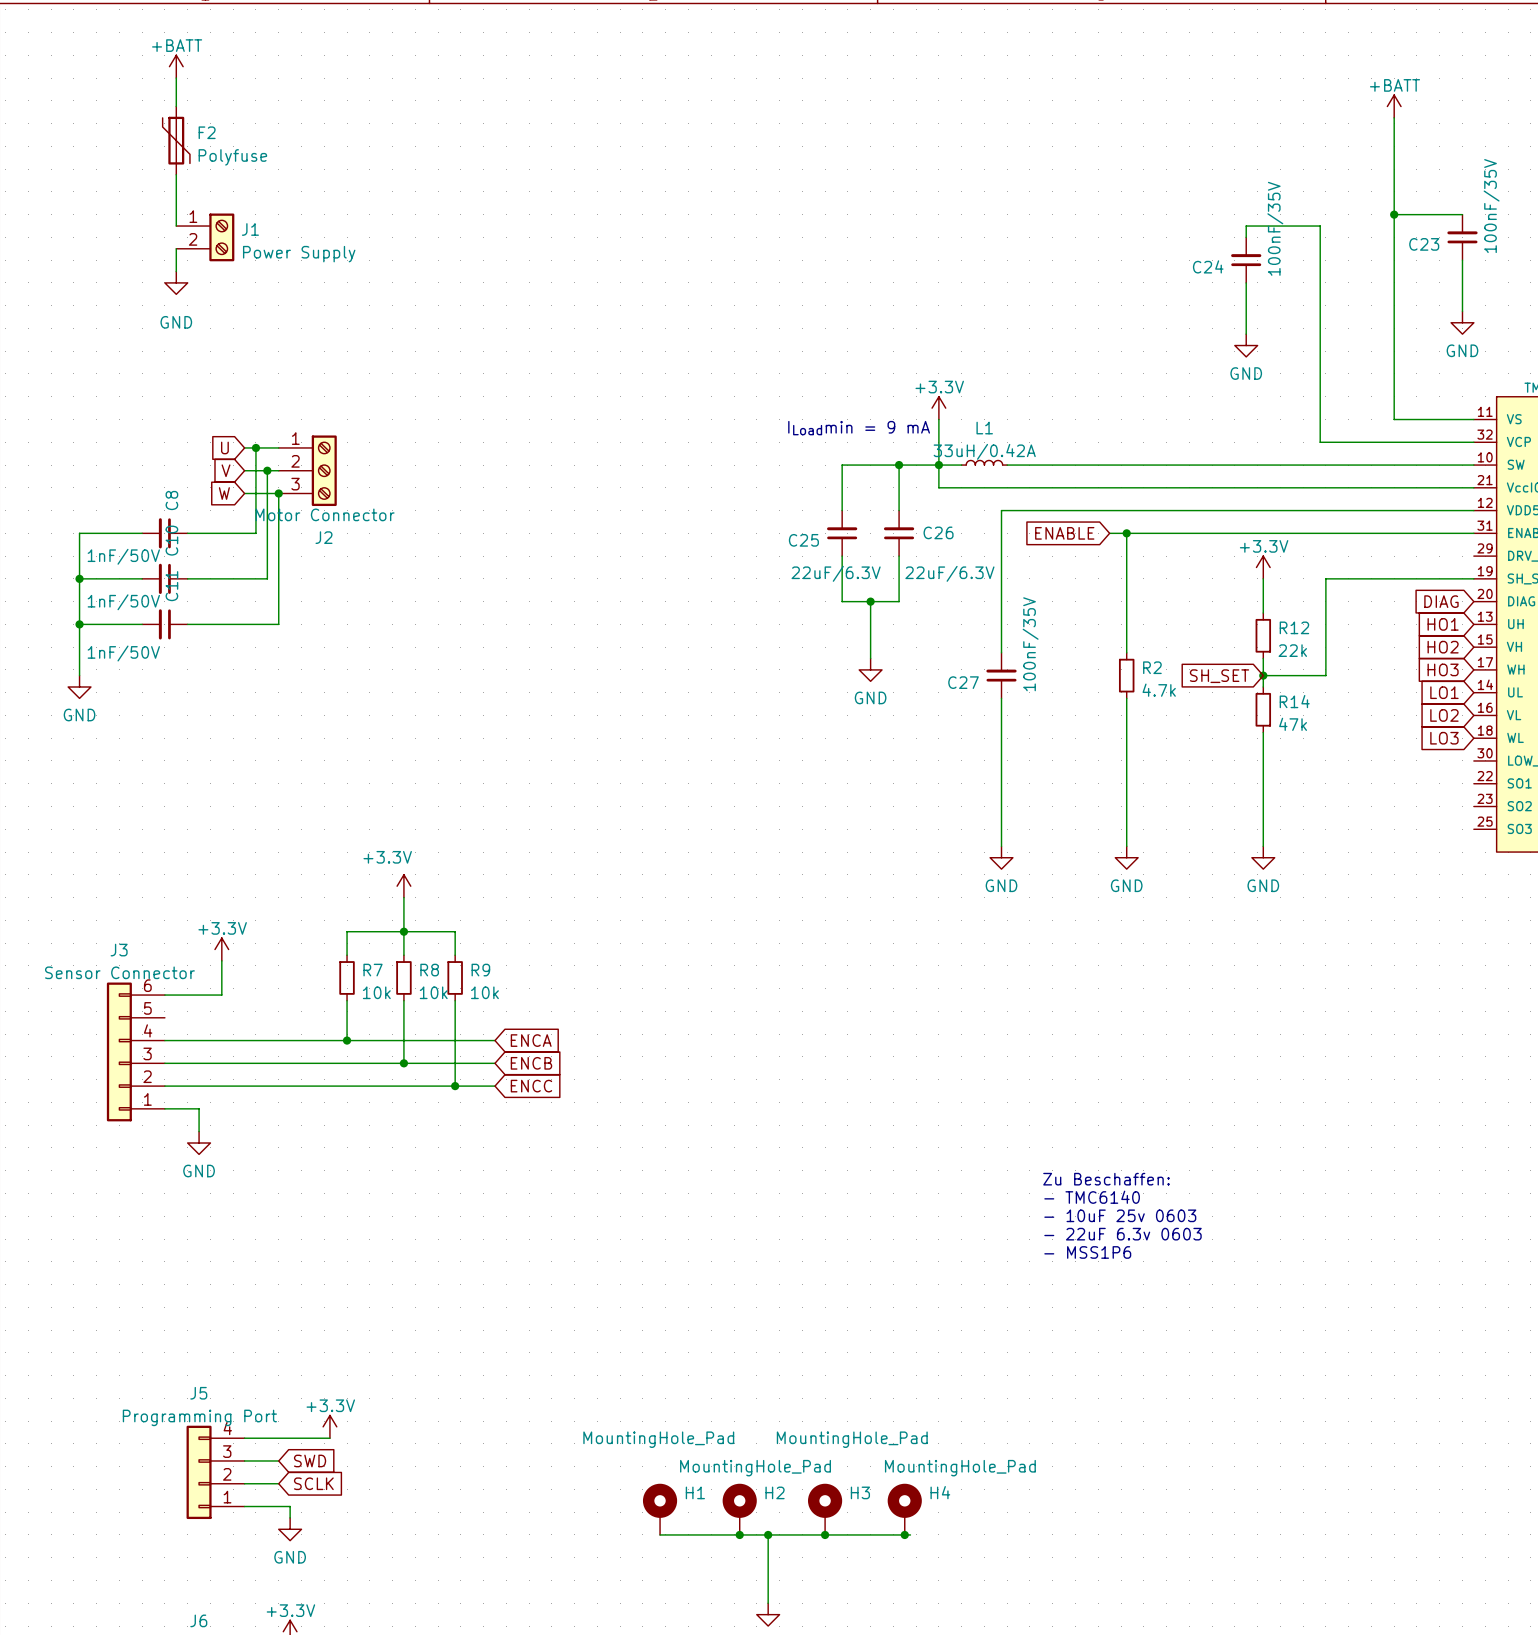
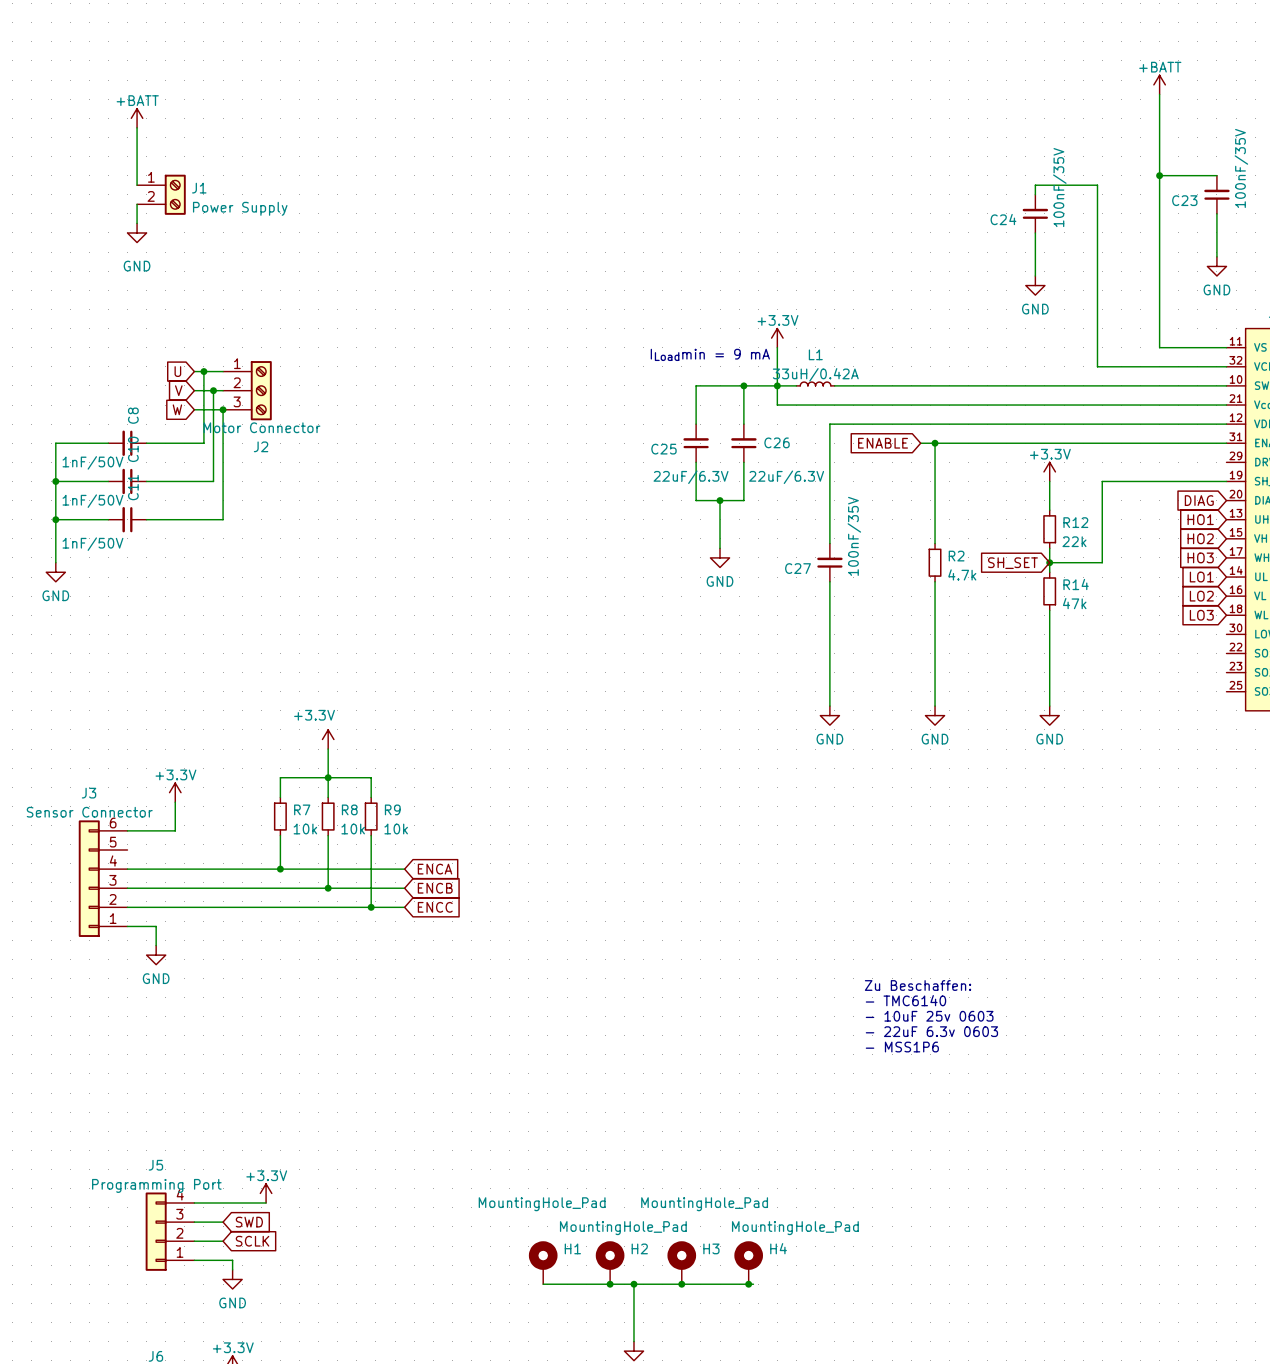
power symbol position: +BATT (176, 66) -> +BATT (137, 118)
wire: (176, 78) (176, 106) -> none
F2: Polyfuse (176, 140) -> none

